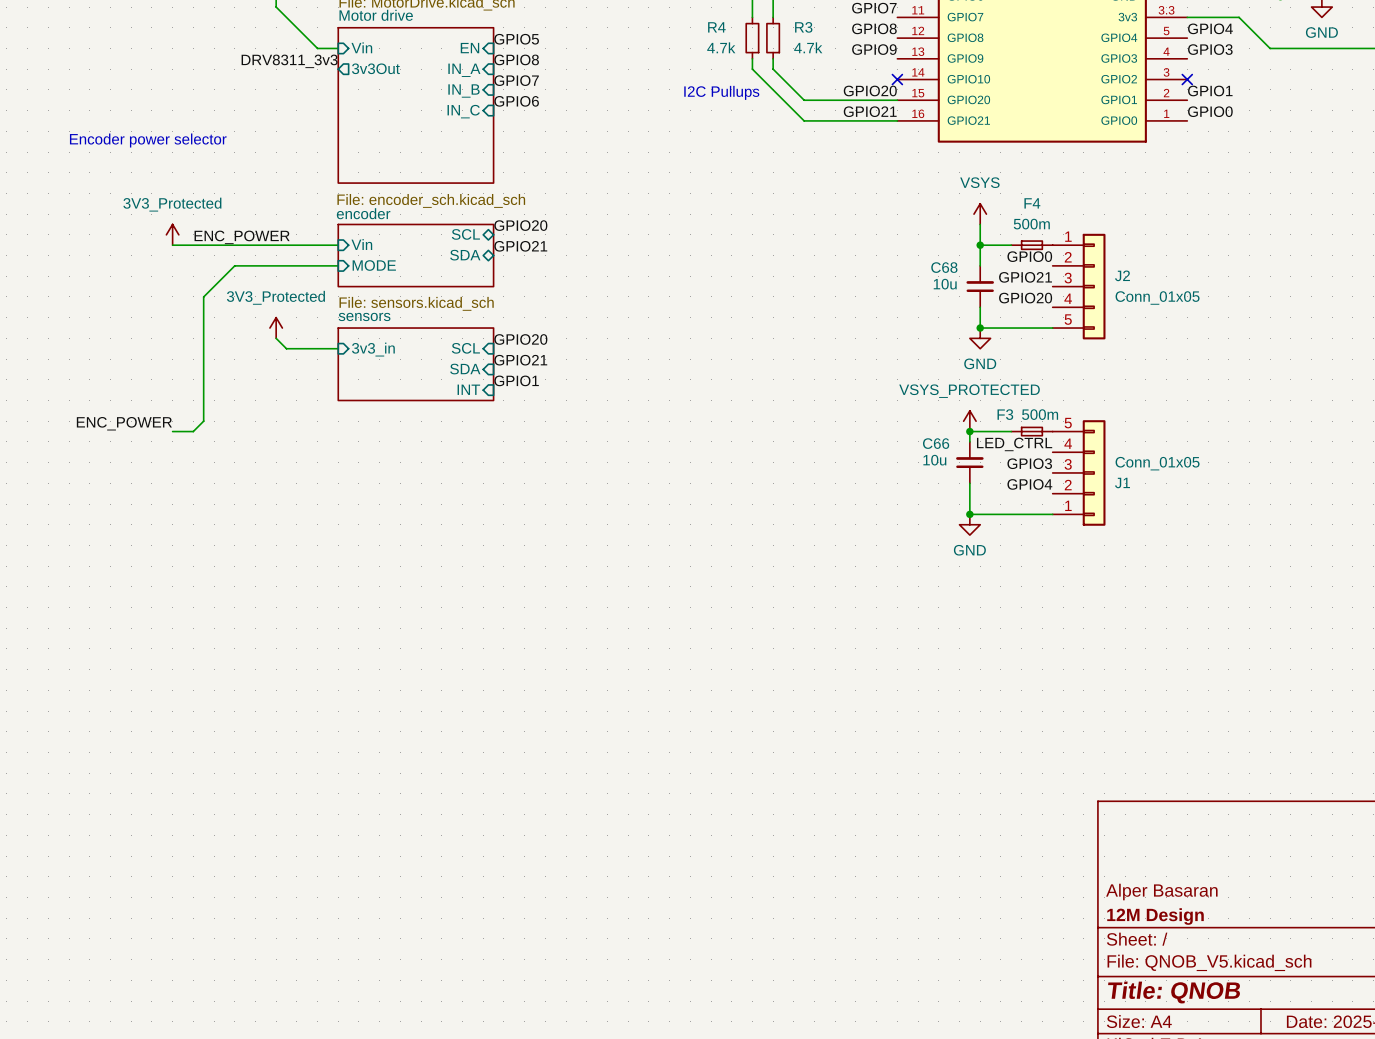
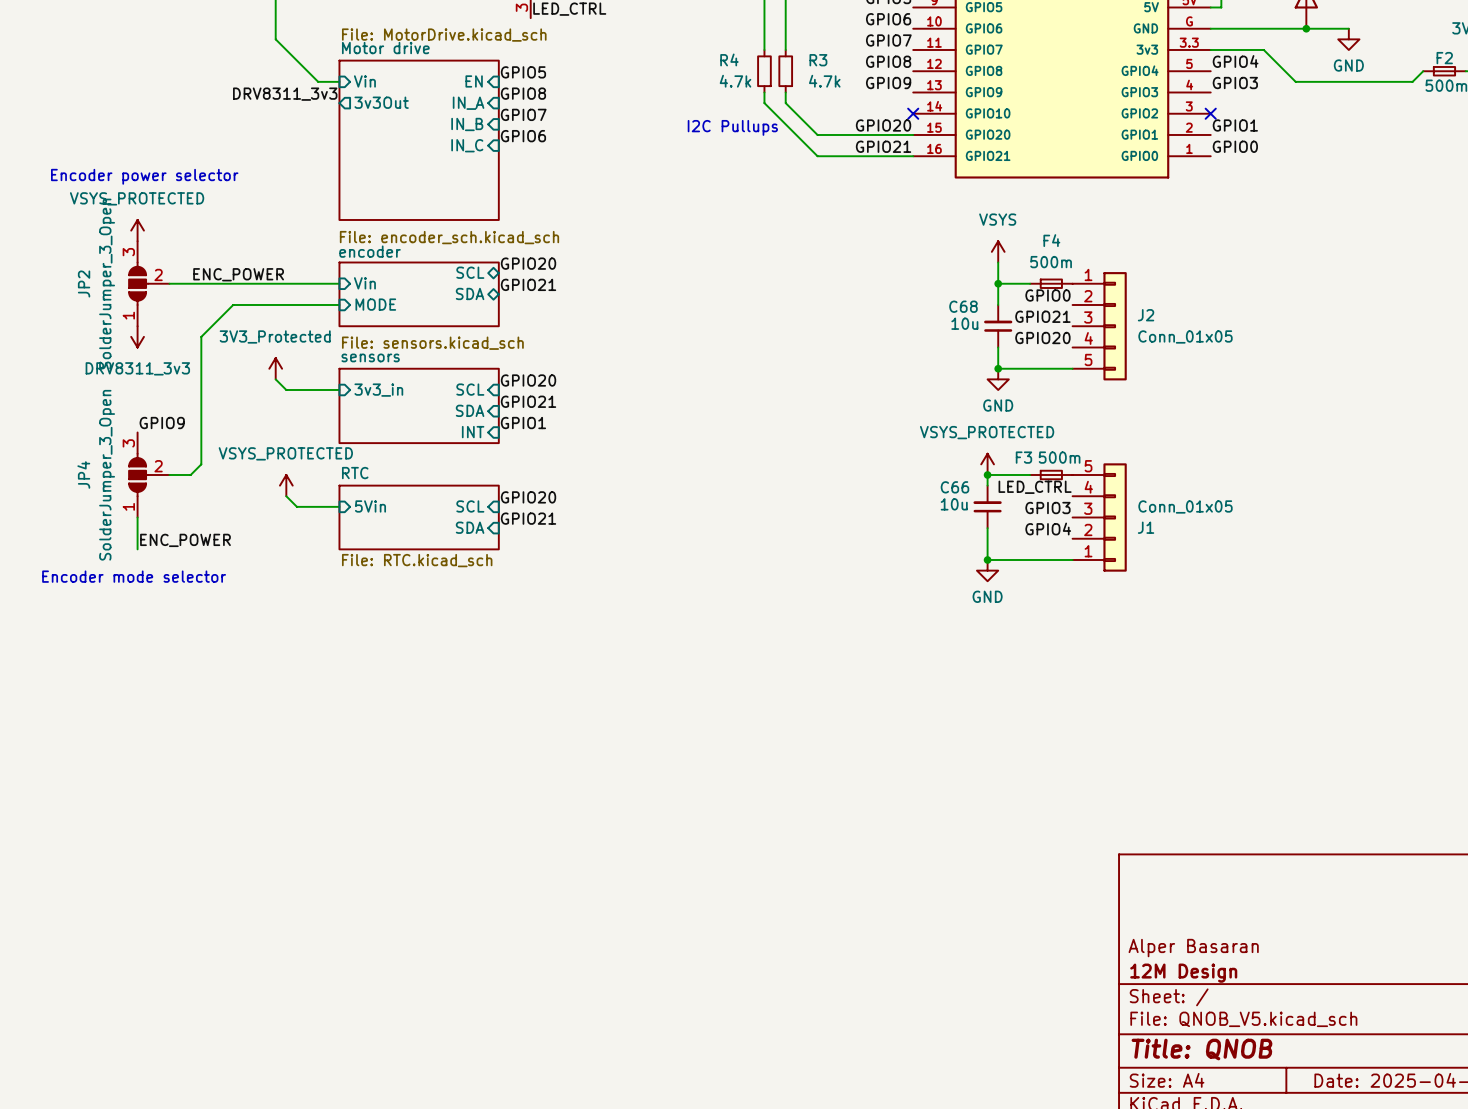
power symbol: none -> VSYS_PROTECTED (137, 230)
power symbol: 3V3_Protected (172, 234) -> none
JP2: none -> SolderJumper_3_Open (149, 283)
power symbol: none -> DRV8311_3v3 (137, 336)
label: none -> GPIO9 (162, 423)
label position: ENC_POWER (124, 423) -> ENC_POWER (185, 540)
JP4: none -> SolderJumper_3_Open (149, 474)
power symbol: none -> VSYS_PROTECTED (286, 485)
wire: none -> (286, 496) (296, 506) (339, 506)
label: none -> GPIO20 (528, 497)
sheet pin: none -> 5Vin (370, 506)
sheet pin: none -> SCL (470, 506)
wire: none -> (137, 517) (137, 549)
sheet RTC: none -> File: RTC.kicad_sch (419, 517)
label: none -> GPIO21 (528, 518)
sheet pin: none -> SDA (470, 527)
text: none -> Encoder mode selector (134, 576)

